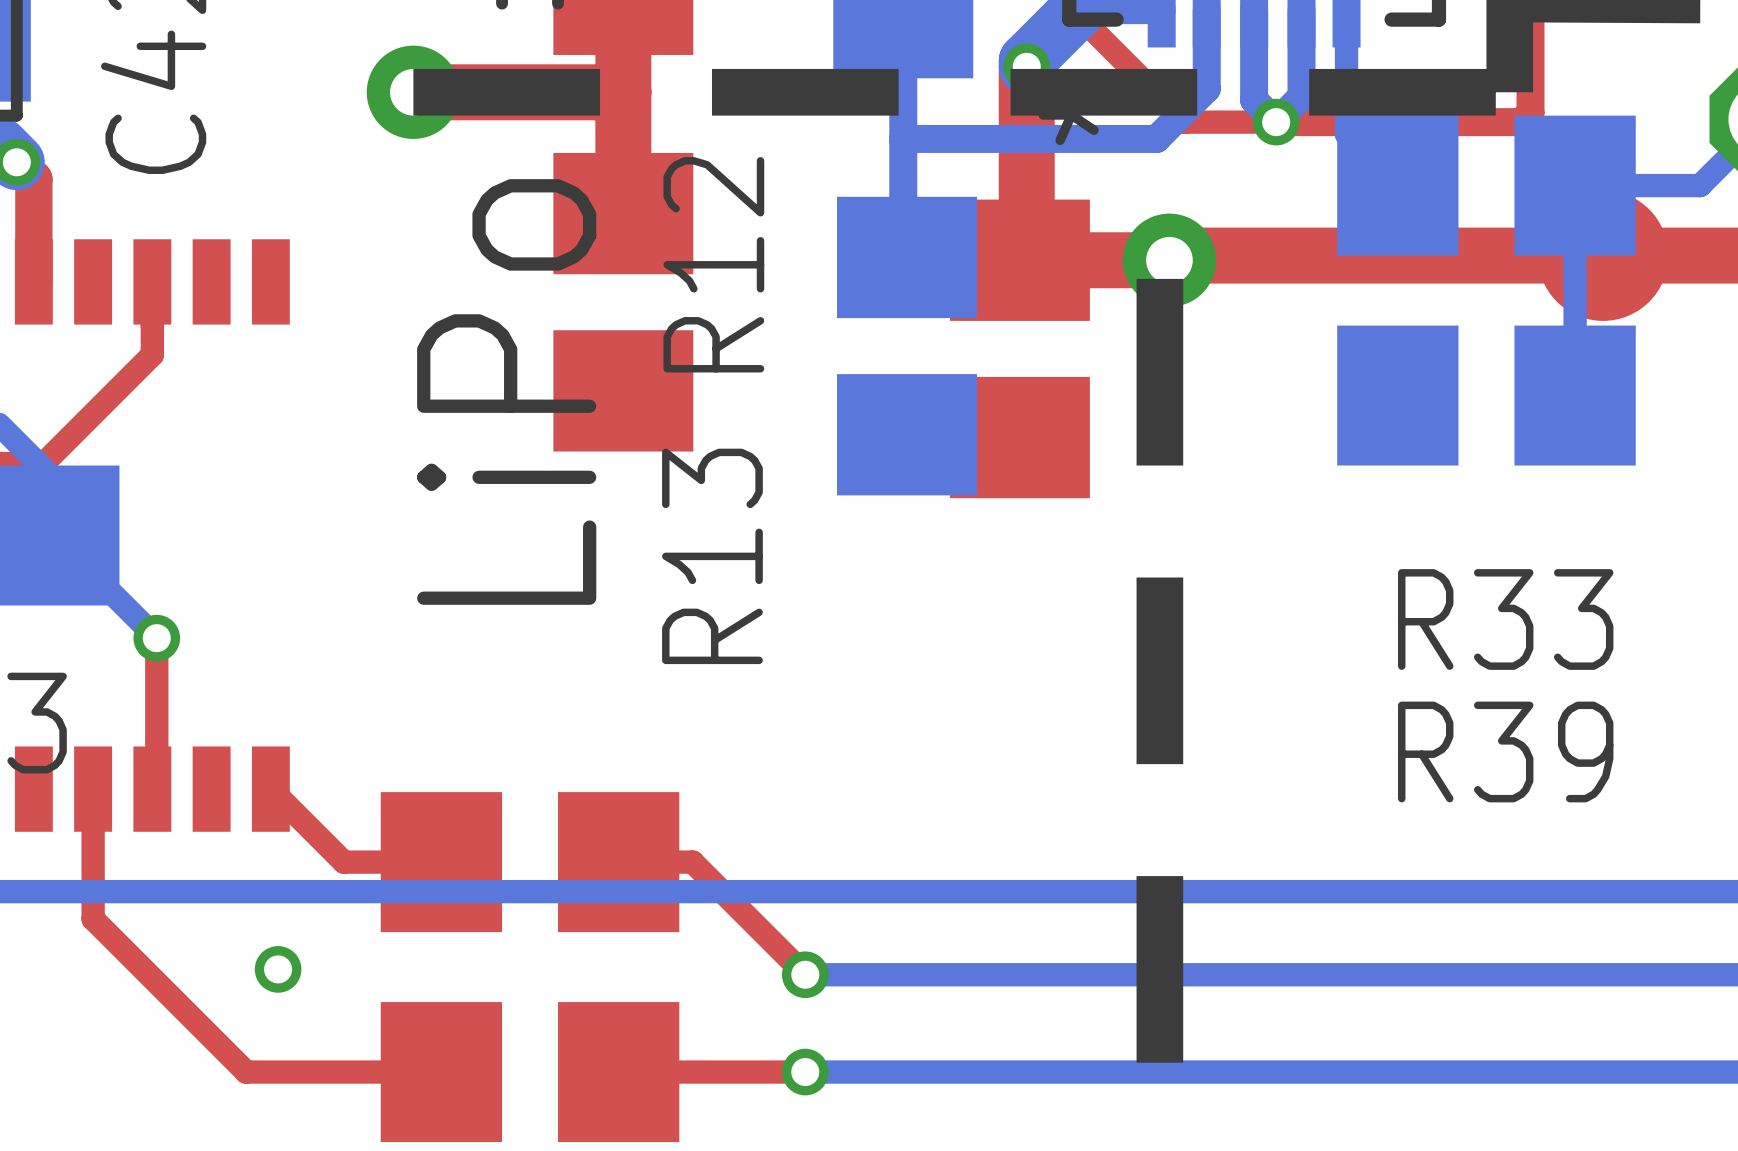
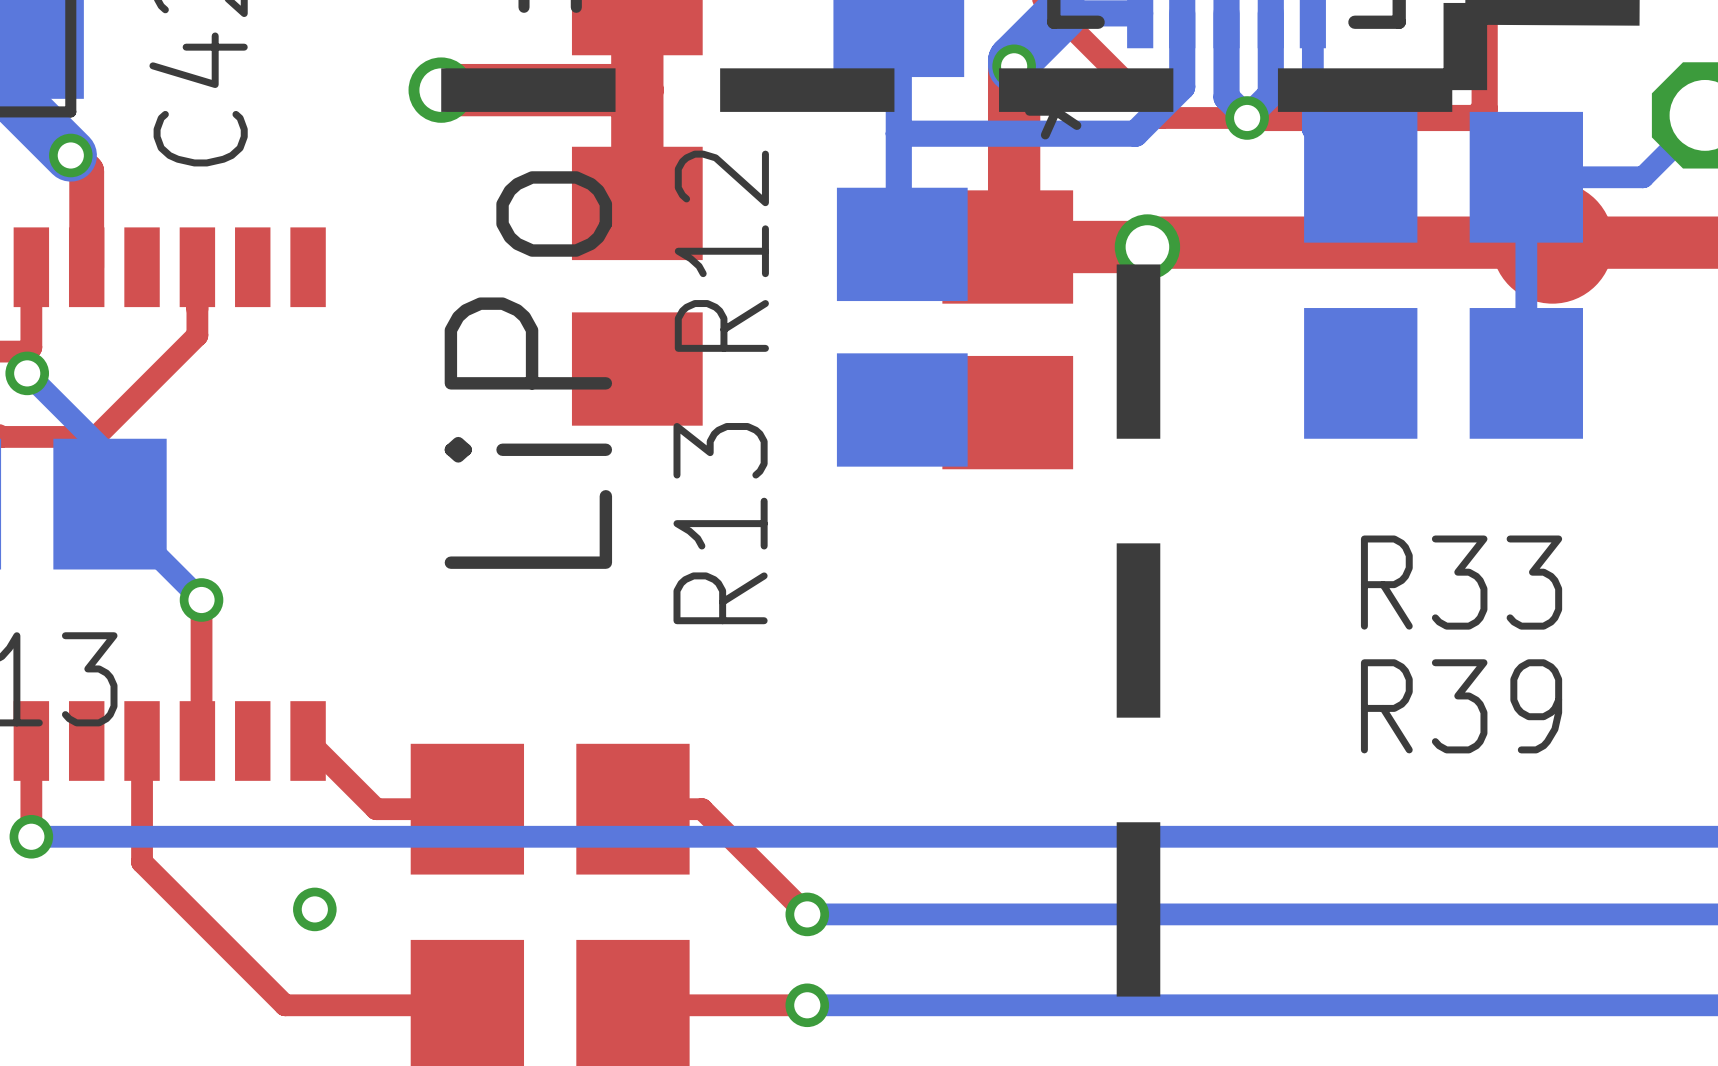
via size: [366, 45, 461, 139] -> [408, 57, 474, 123]
via size: [1122, 213, 1217, 307] -> [1114, 214, 1181, 280]

